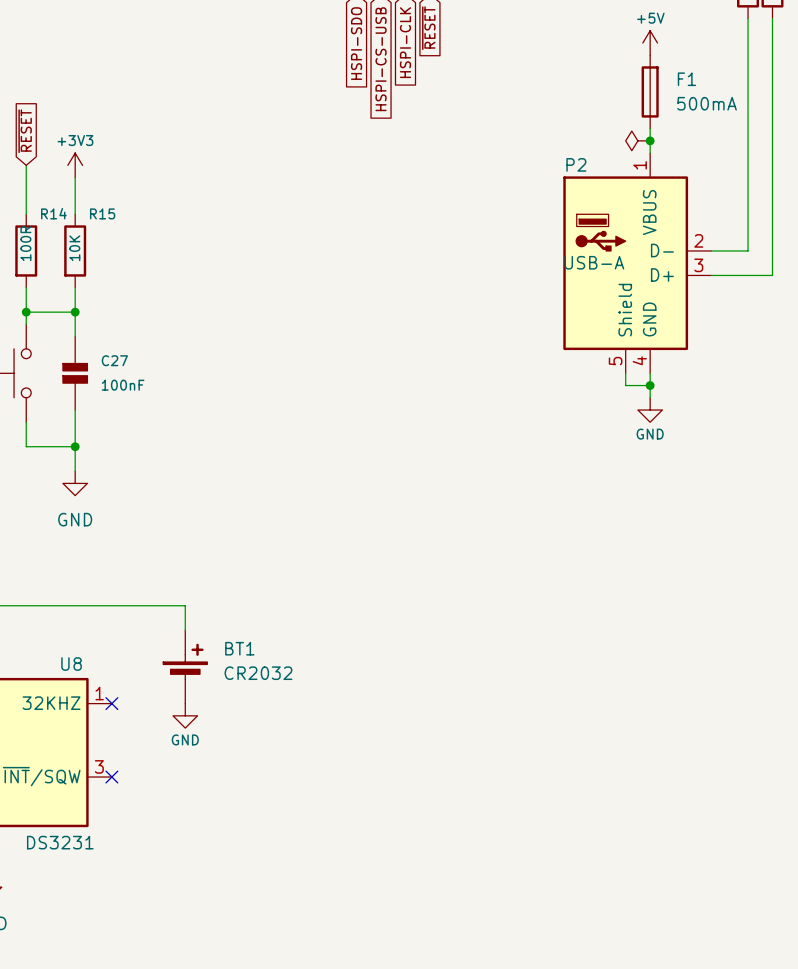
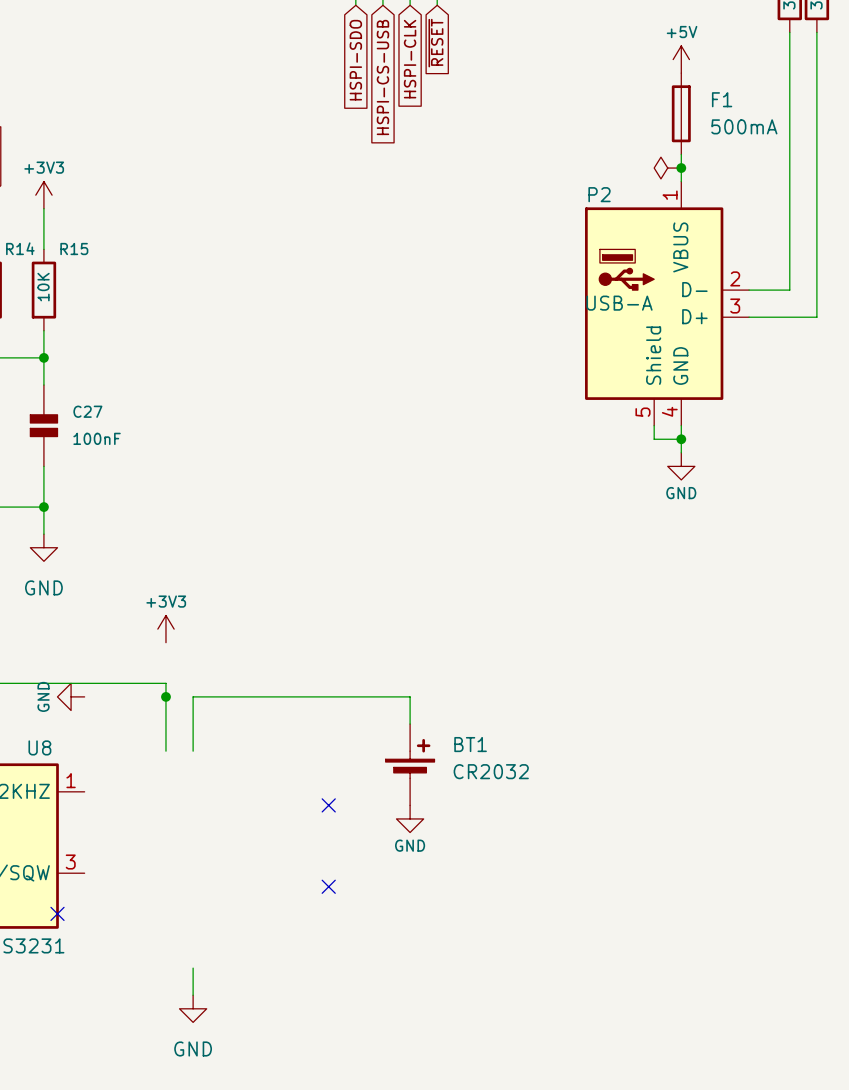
power symbol: none -> +3V3 (165, 629)
power symbol: none -> GND (71, 696)
junction: none -> (165, 696)
wire: none -> (410, 724) (410, 696) (193, 696) (193, 751)
BT1 position: (185, 666) -> (410, 764)
no-connect mark: (111, 703) -> none
power symbol: GND (185, 715) -> none
no-connect mark: none -> (328, 805)
power symbol: none -> GND (410, 818)
no-connect mark position: (111, 777) -> (57, 913)
no-connect mark: none -> (328, 886)
wire: none -> (193, 968) (193, 995)
power symbol: none -> GND (193, 1008)

